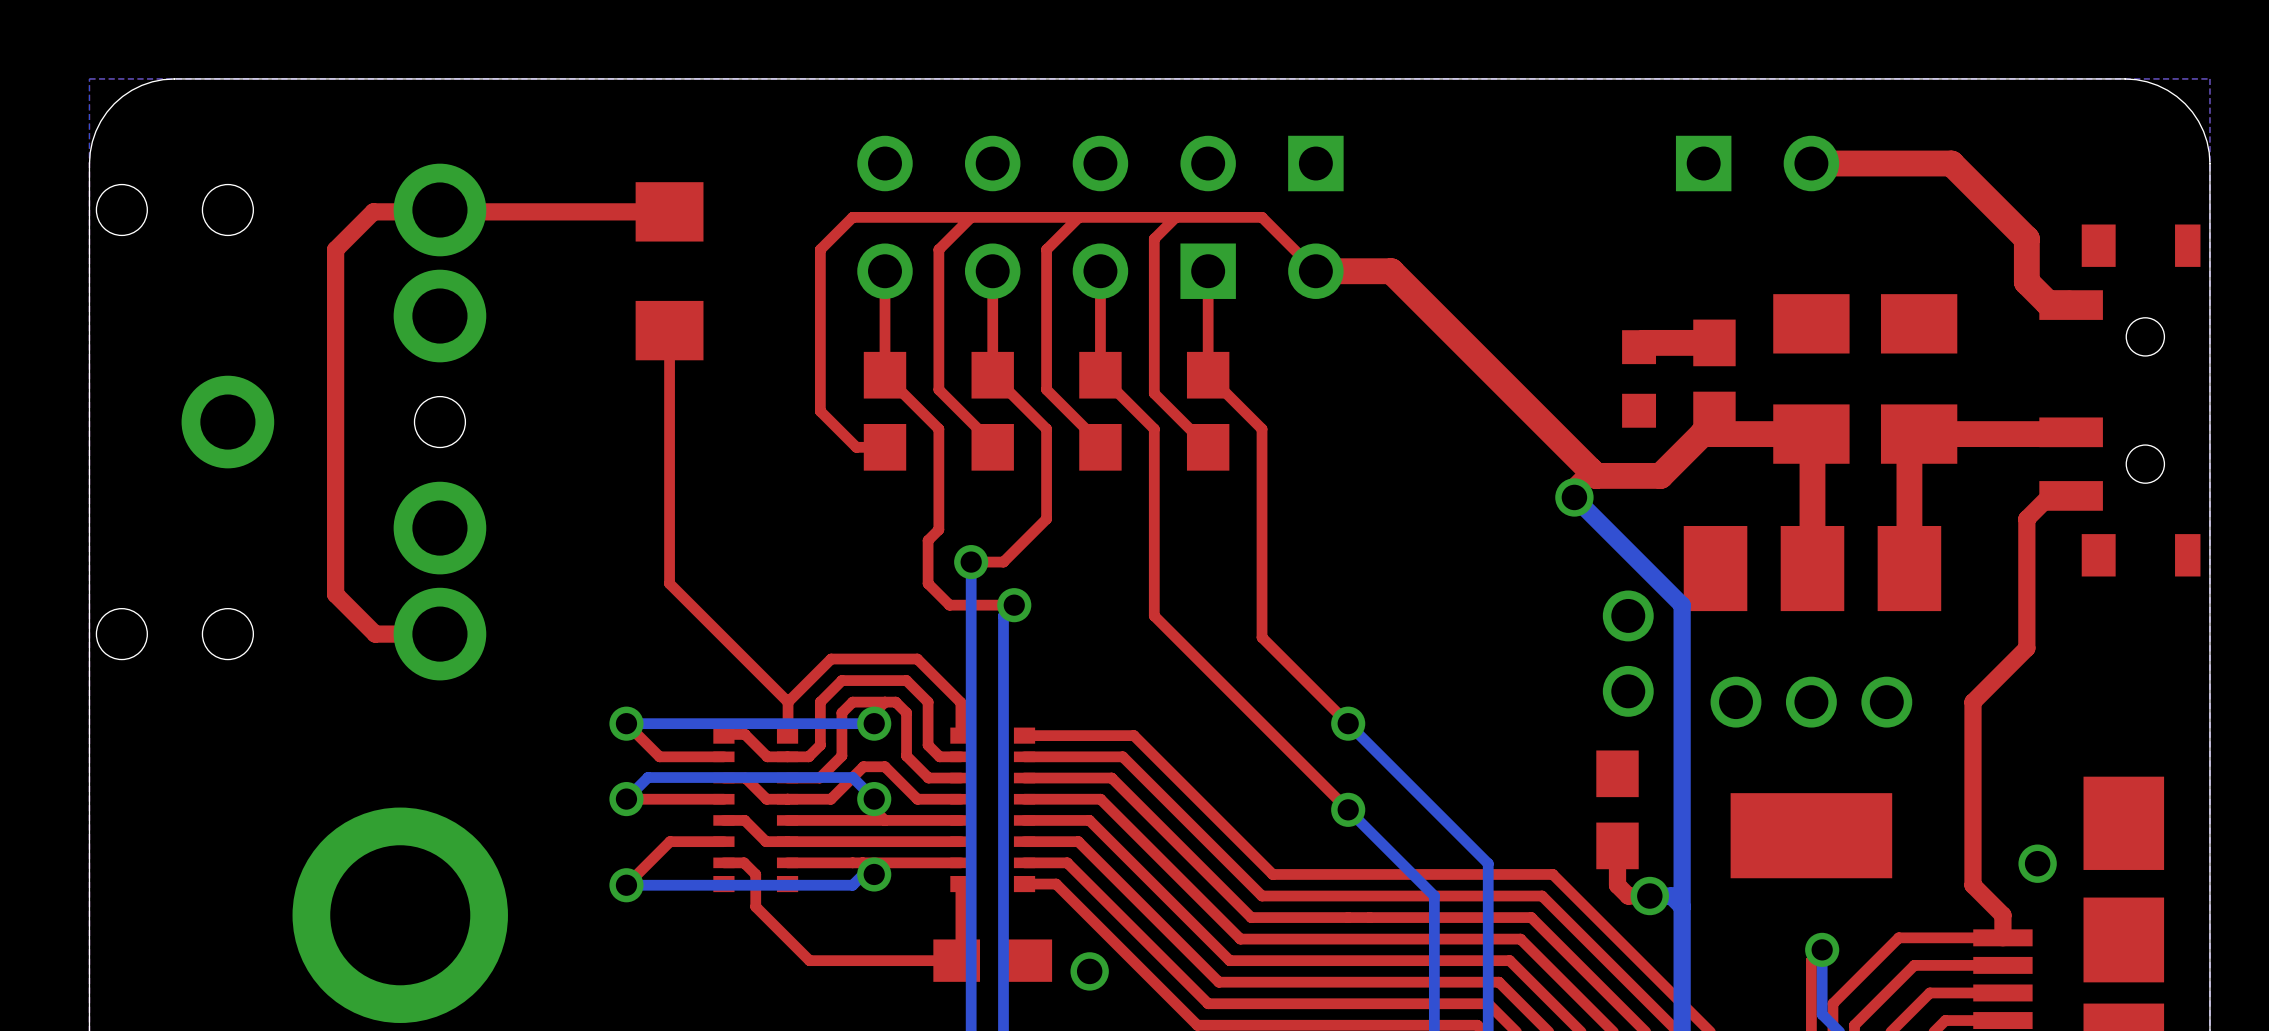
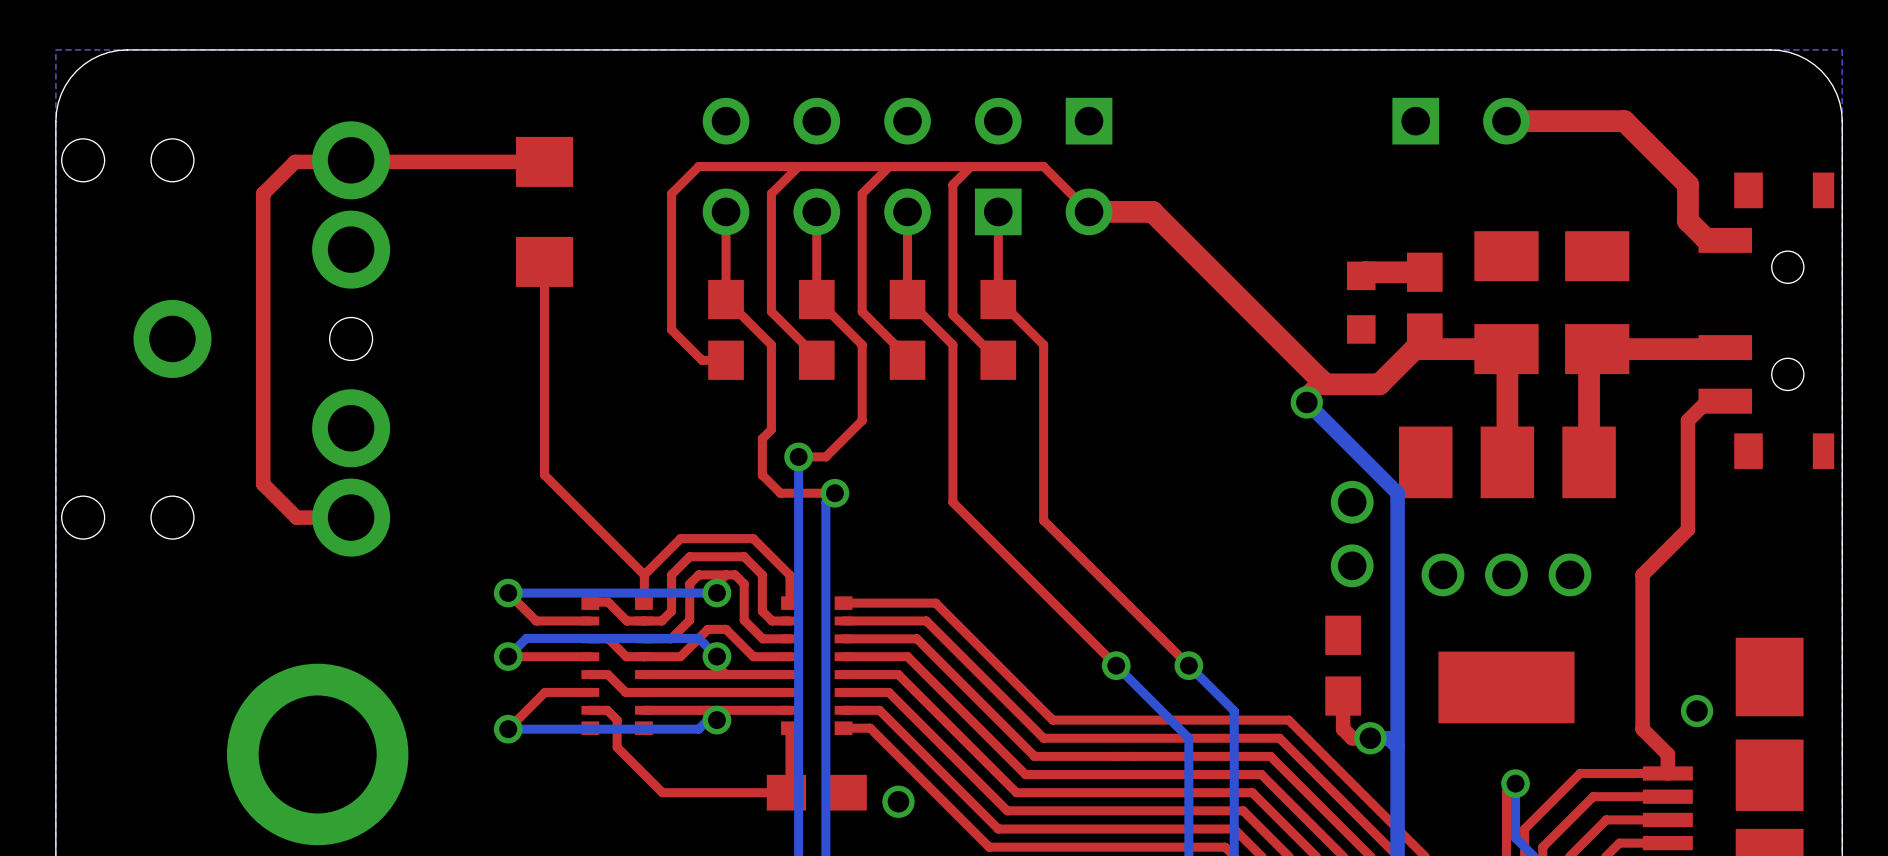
top track: none -> (1116, 593) (1188, 665)
bottom track: (1348, 723) (1434, 809) -> none
via position: (1348, 723) -> (1188, 665)

